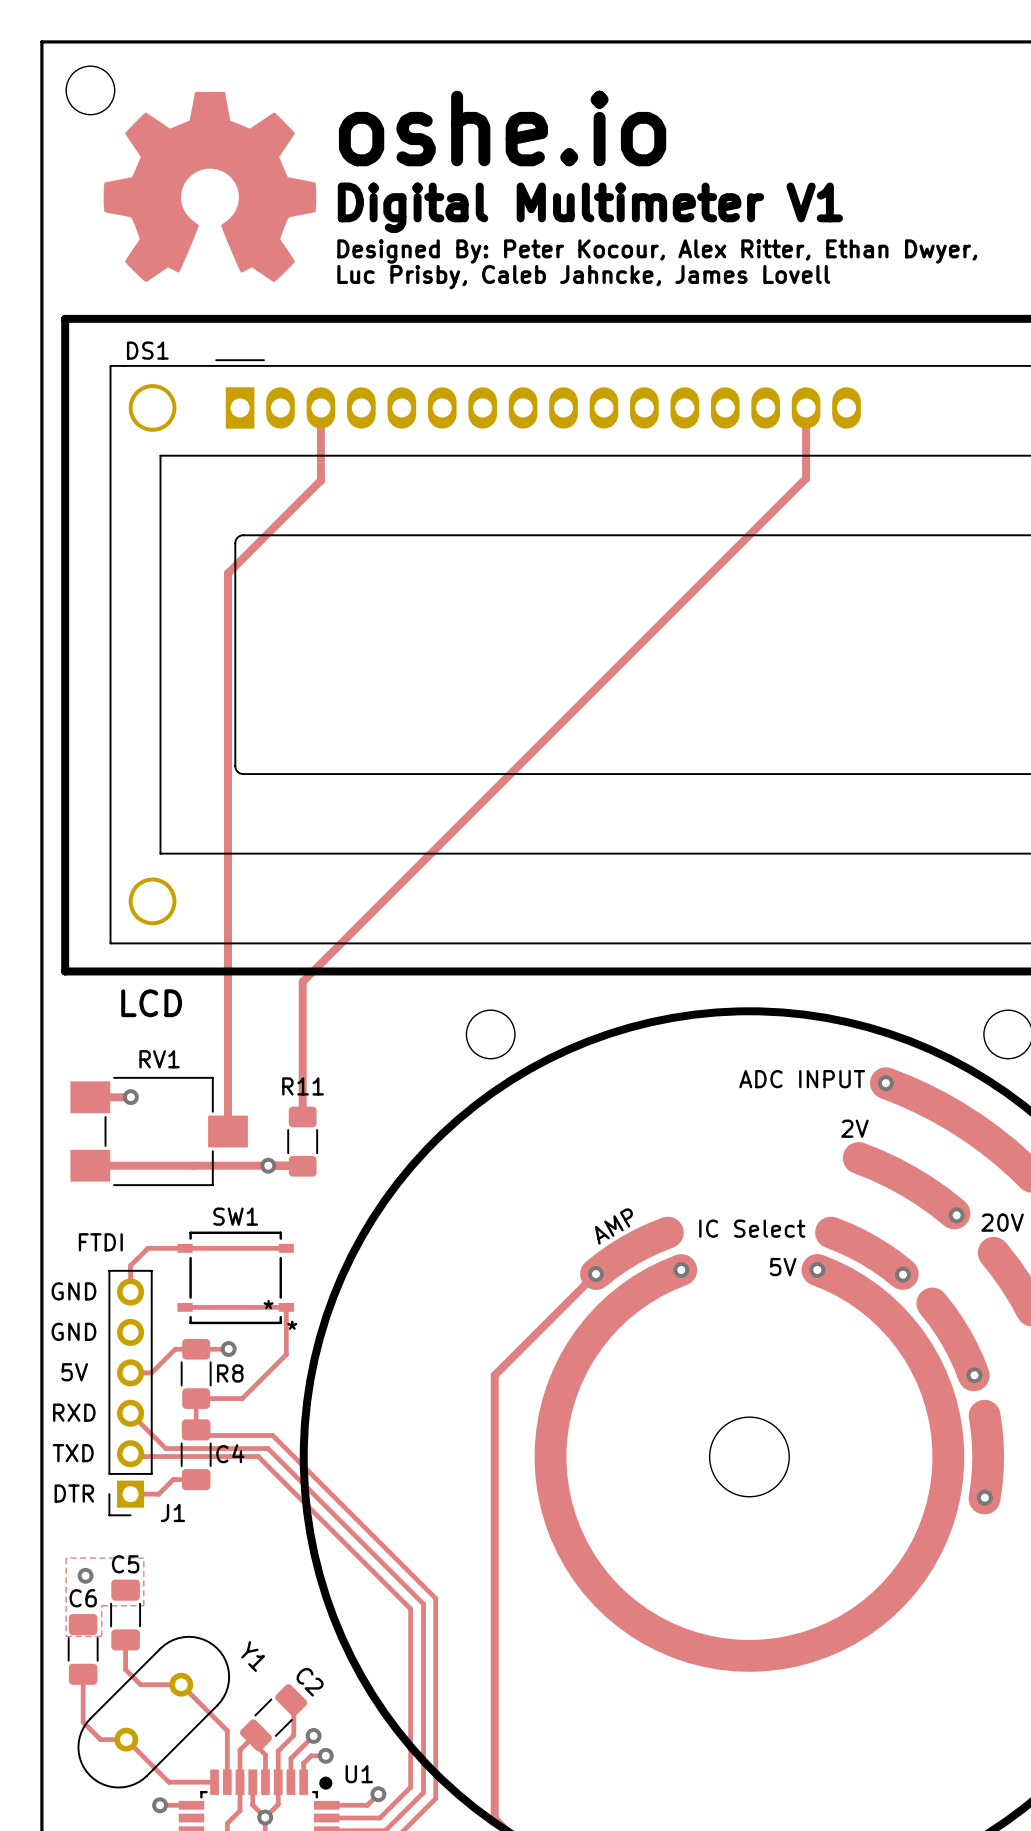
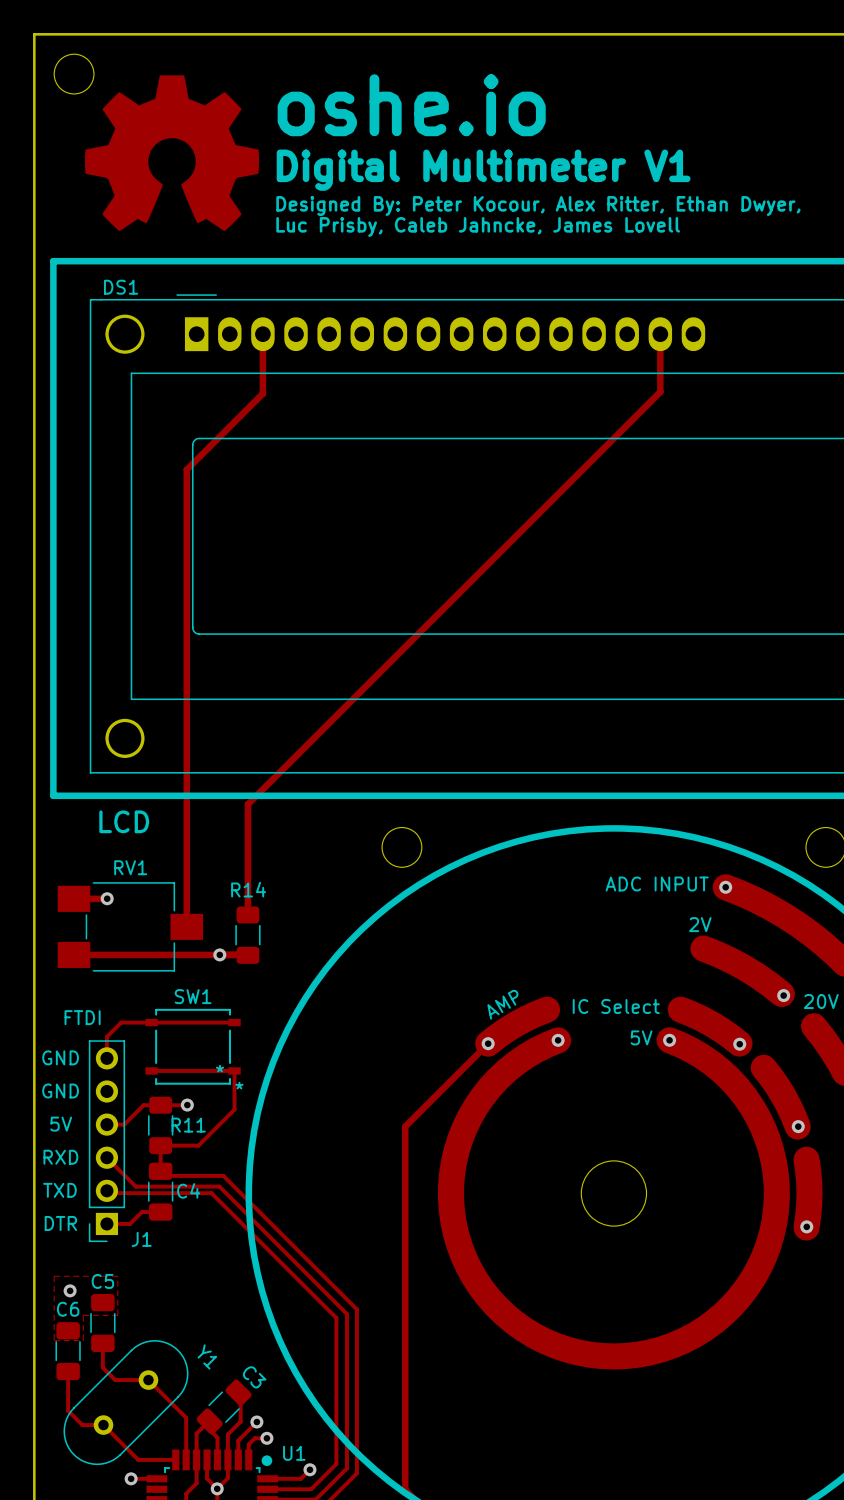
R11 name: R11 (303, 1086) -> R14 (248, 889)
R8 name: R8 (230, 1373) -> R11 (188, 1125)
C2 name: C2 (310, 1682) -> C3 (254, 1377)

